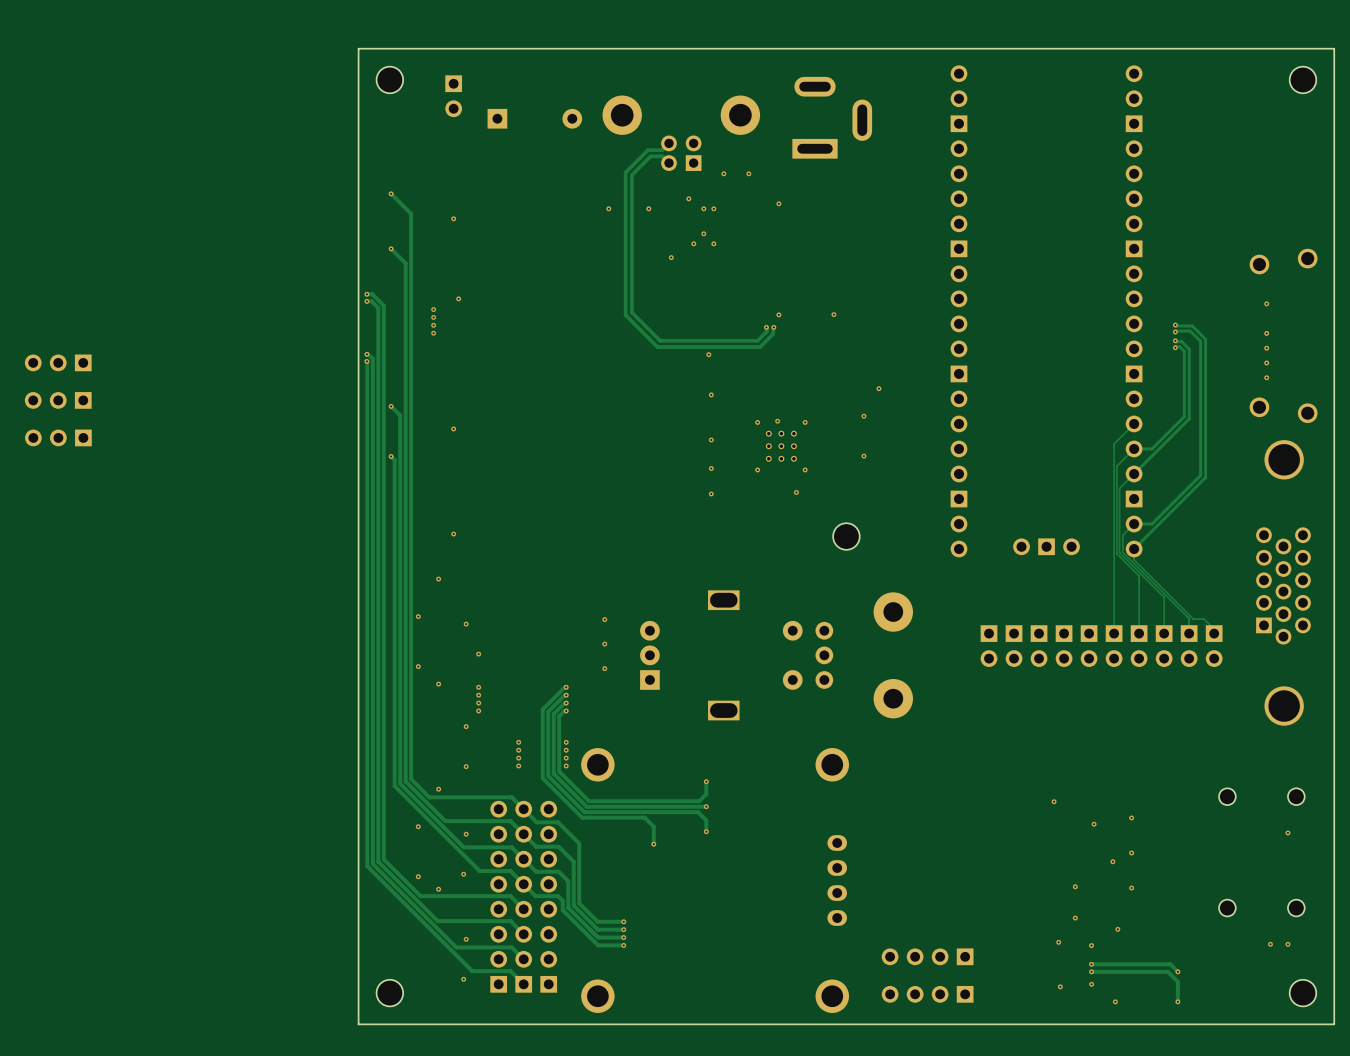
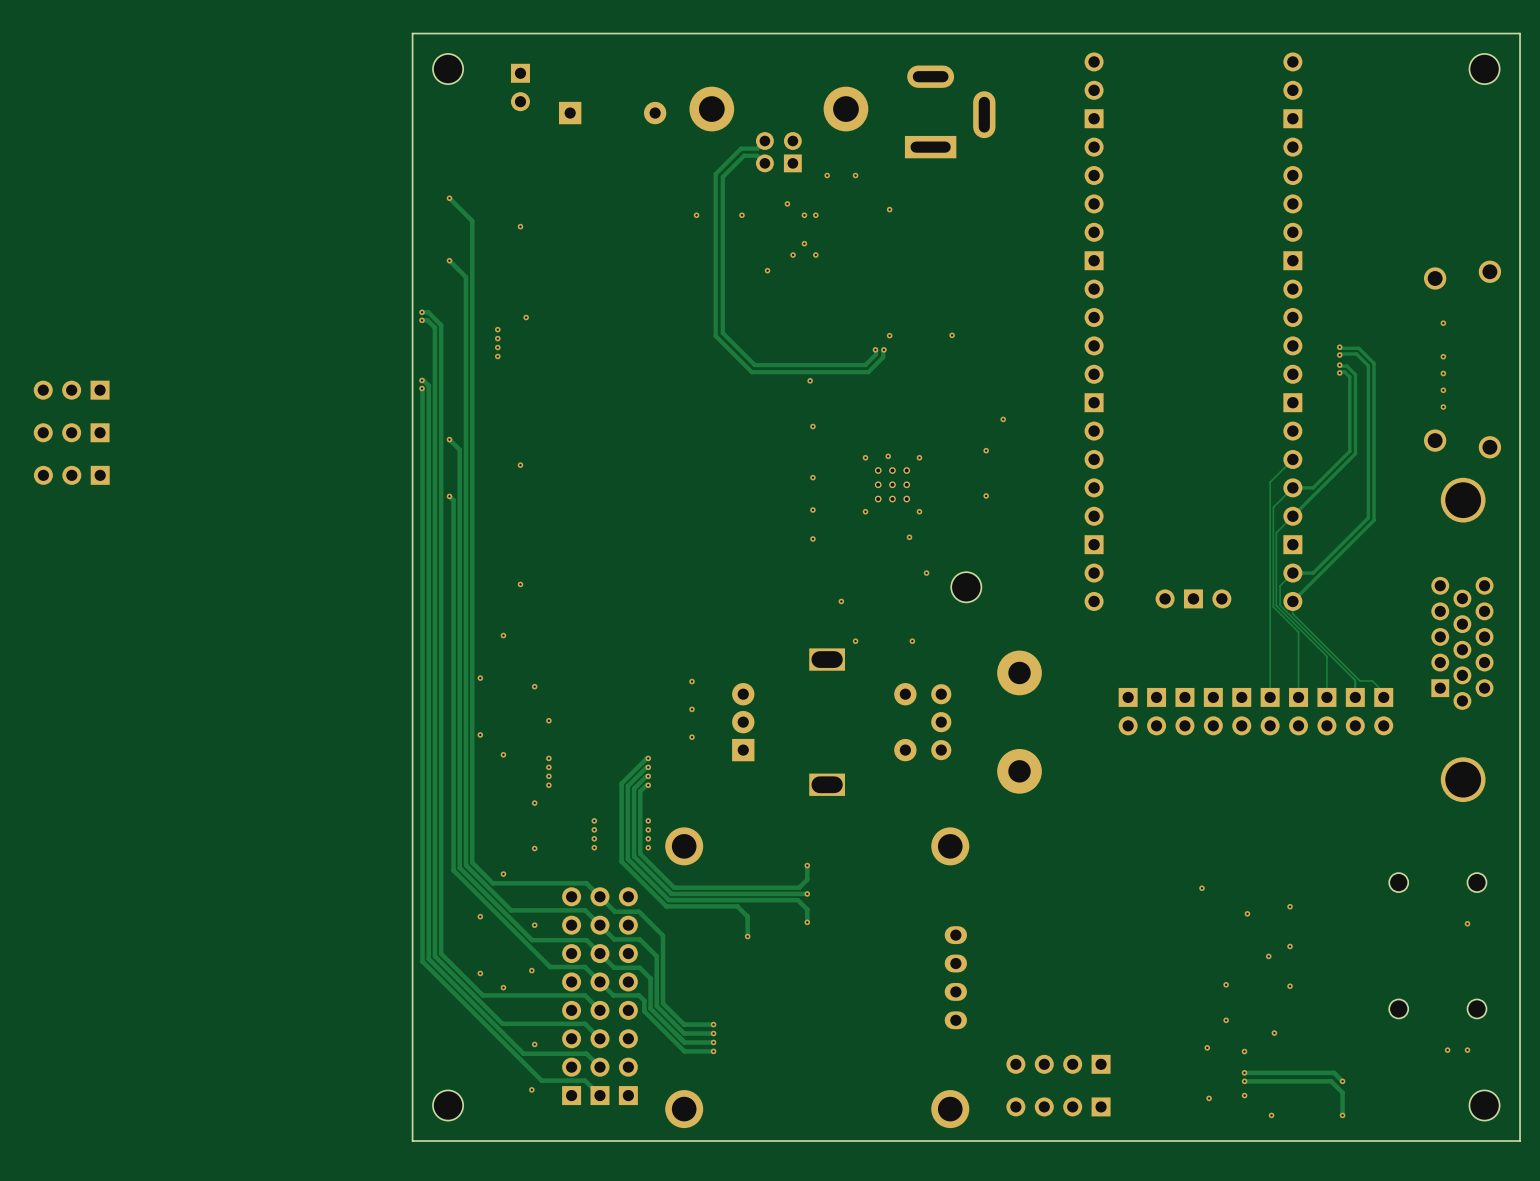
via: none -> (926, 573)
via: none -> (841, 601)
via: none -> (855, 641)
via: none -> (912, 641)

